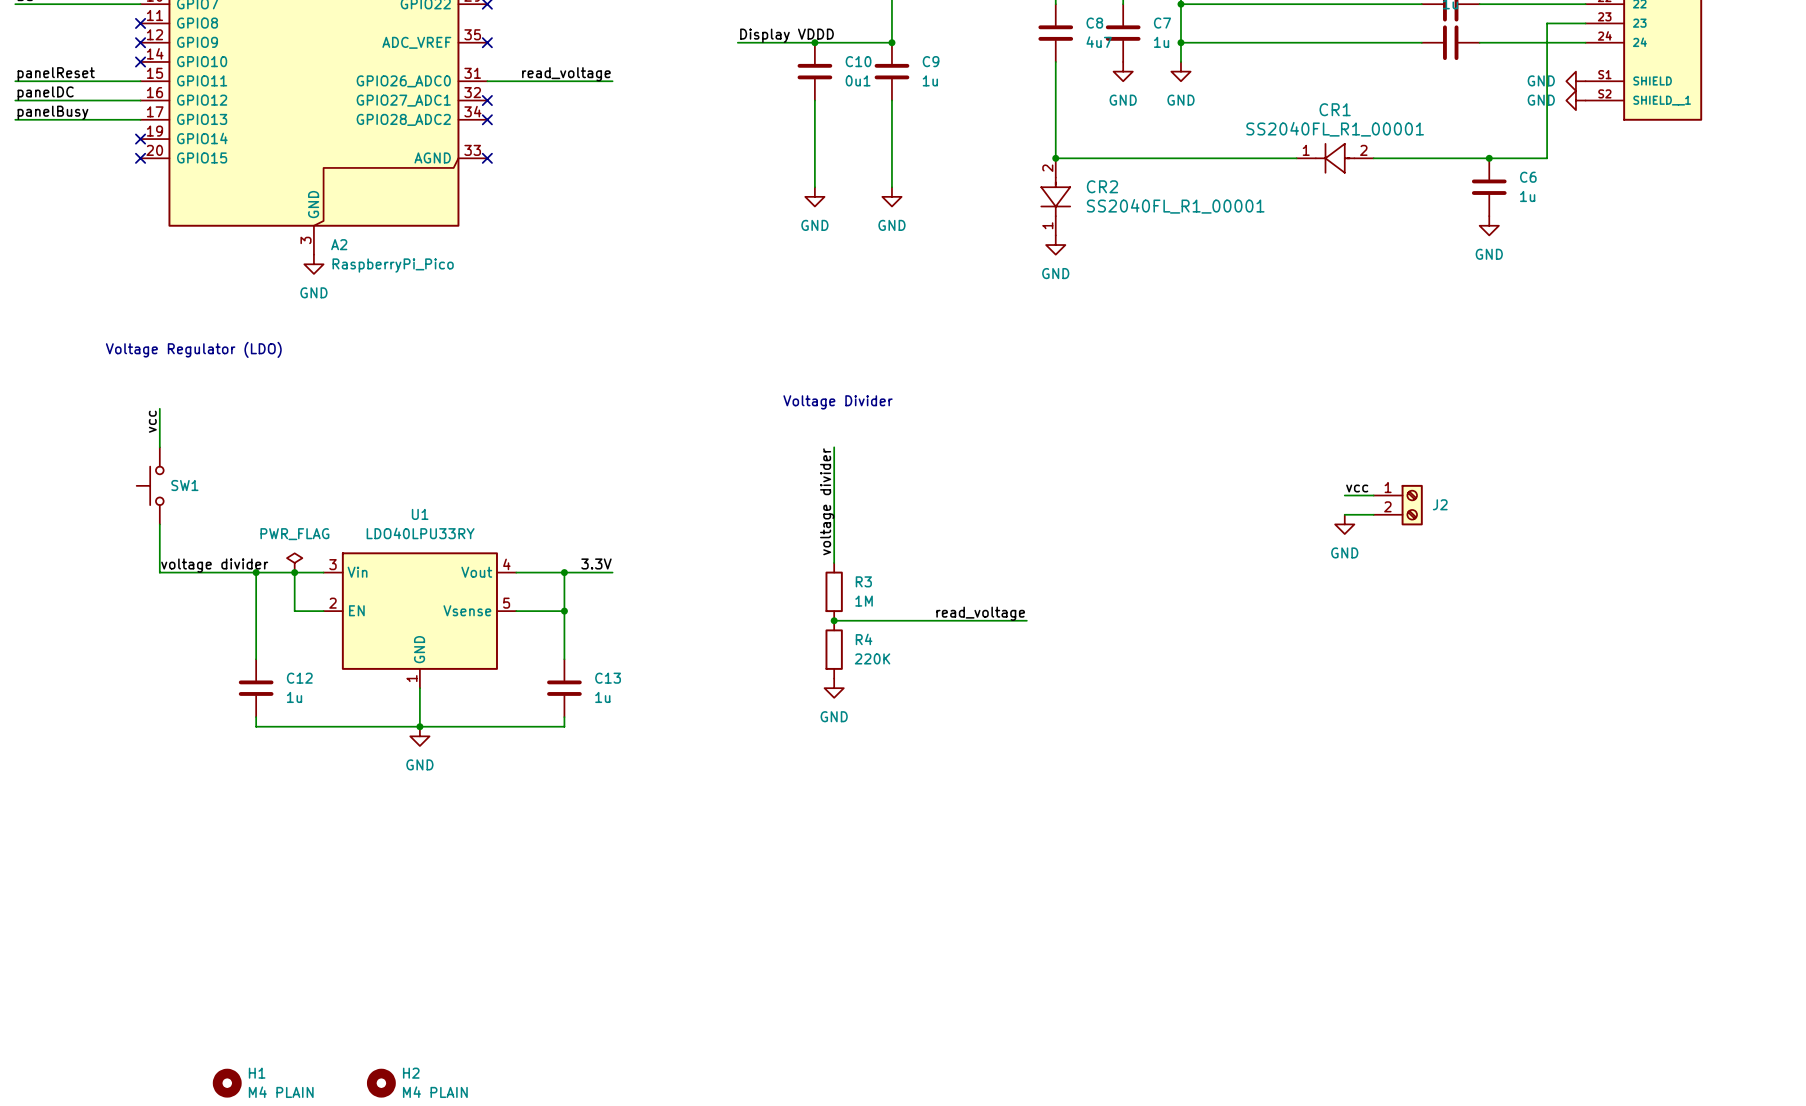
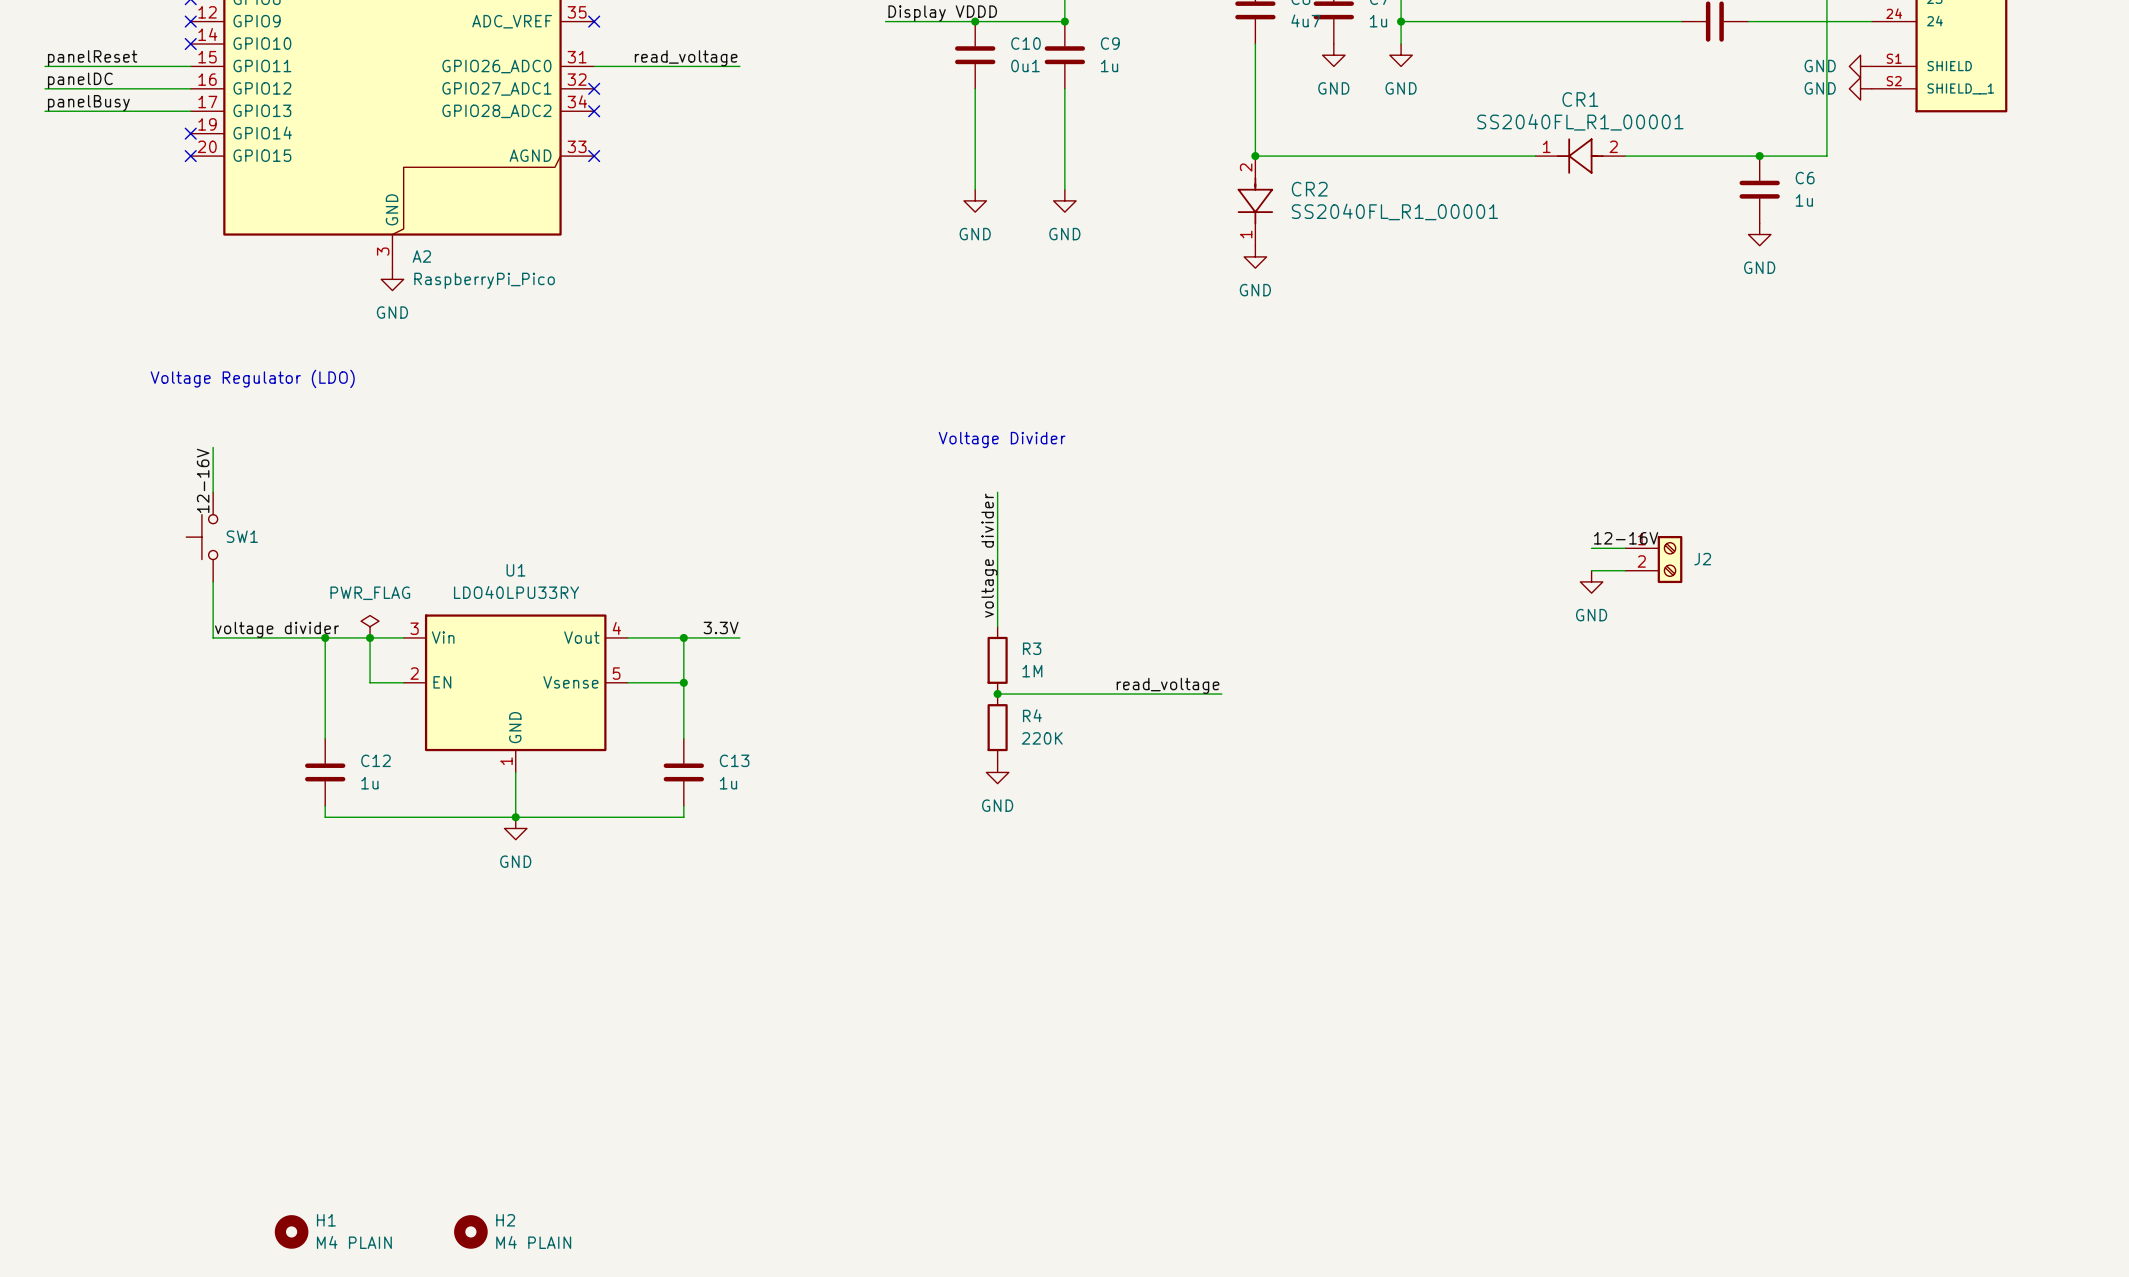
label: vcc (152, 421) -> 12-16V (203, 480)
label: vcc (1357, 488) -> 12-16V (1626, 538)

